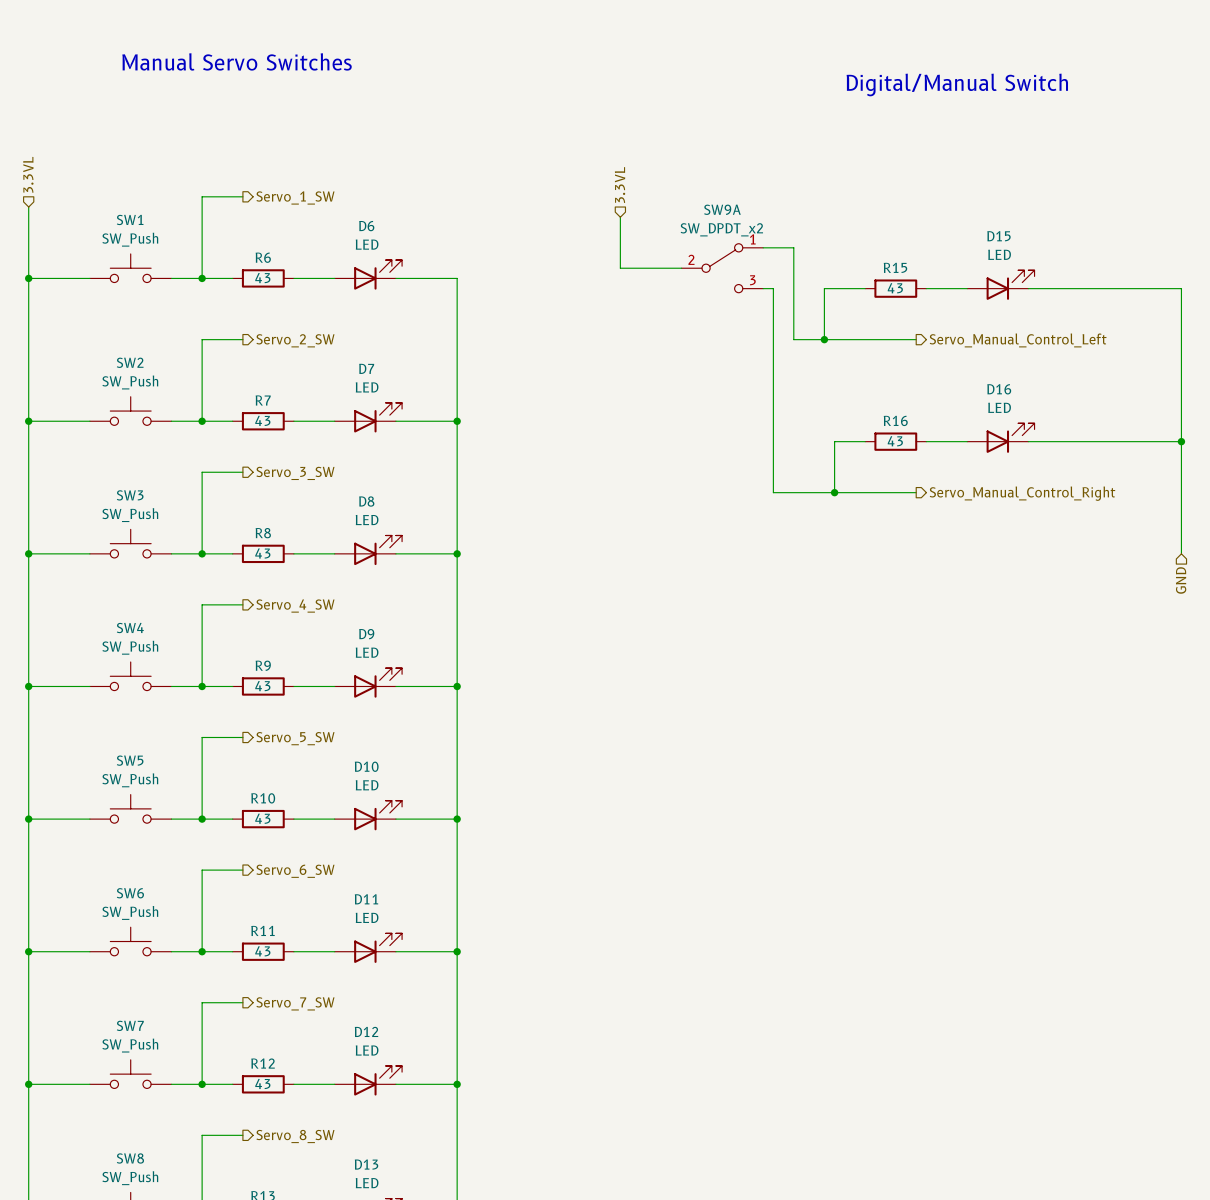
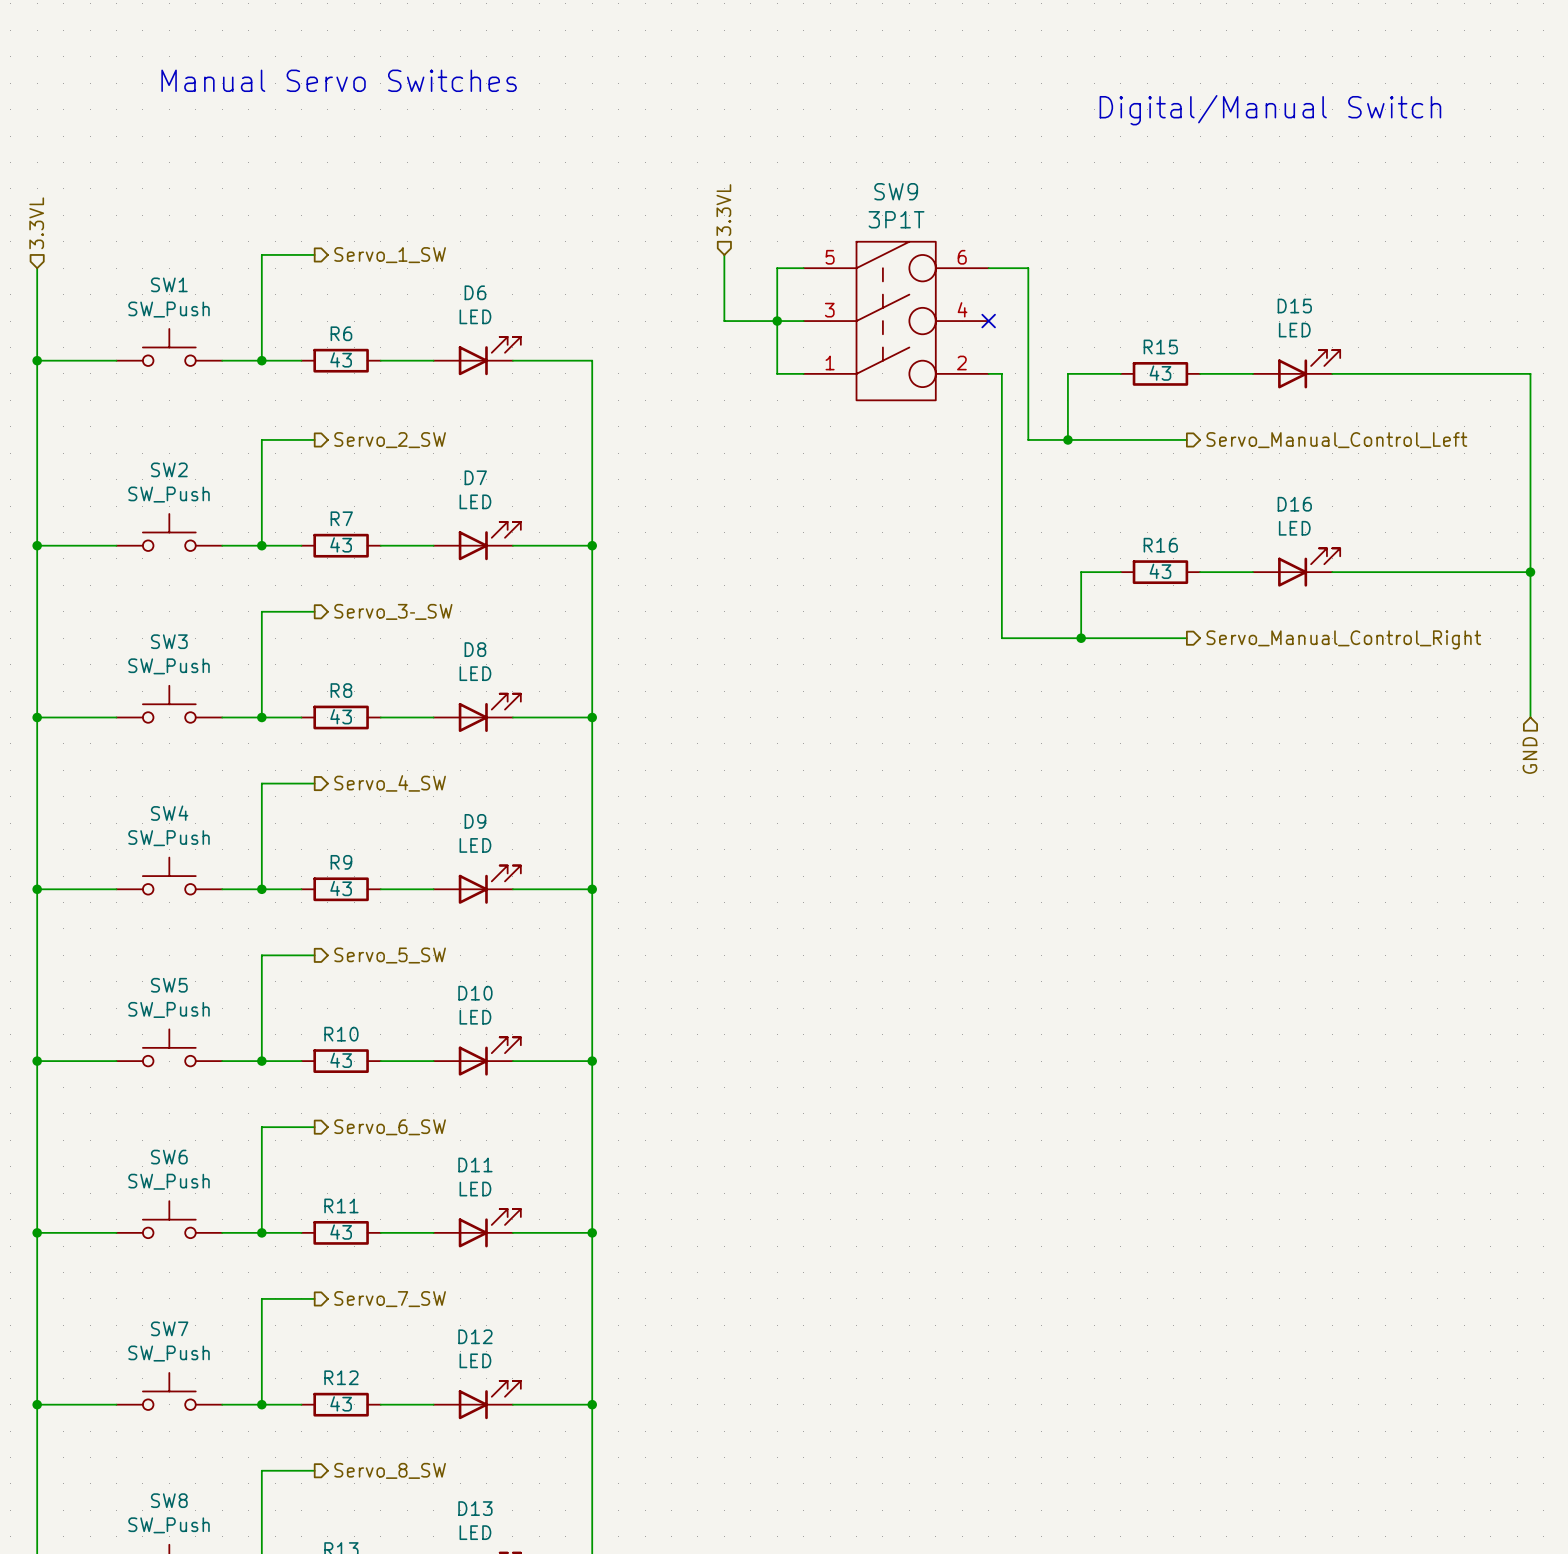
hierarchical label position: 3.3VL (620, 185) -> 3.3VL (723, 210)
wire: none -> (803, 268) (777, 268) (777, 373) (803, 373)
wire: (620, 217) (620, 268) (681, 268) -> (724, 254) (724, 321) (803, 321)
junction: none -> (777, 321)
SW9: none -> 3P1T (896, 321)
wire: (763, 247) (793, 247) -> (988, 268) (1028, 268) (1028, 321)
no-connect mark: none -> (988, 321)
SW9A: SW_DPDT_x2 (722, 268) -> none

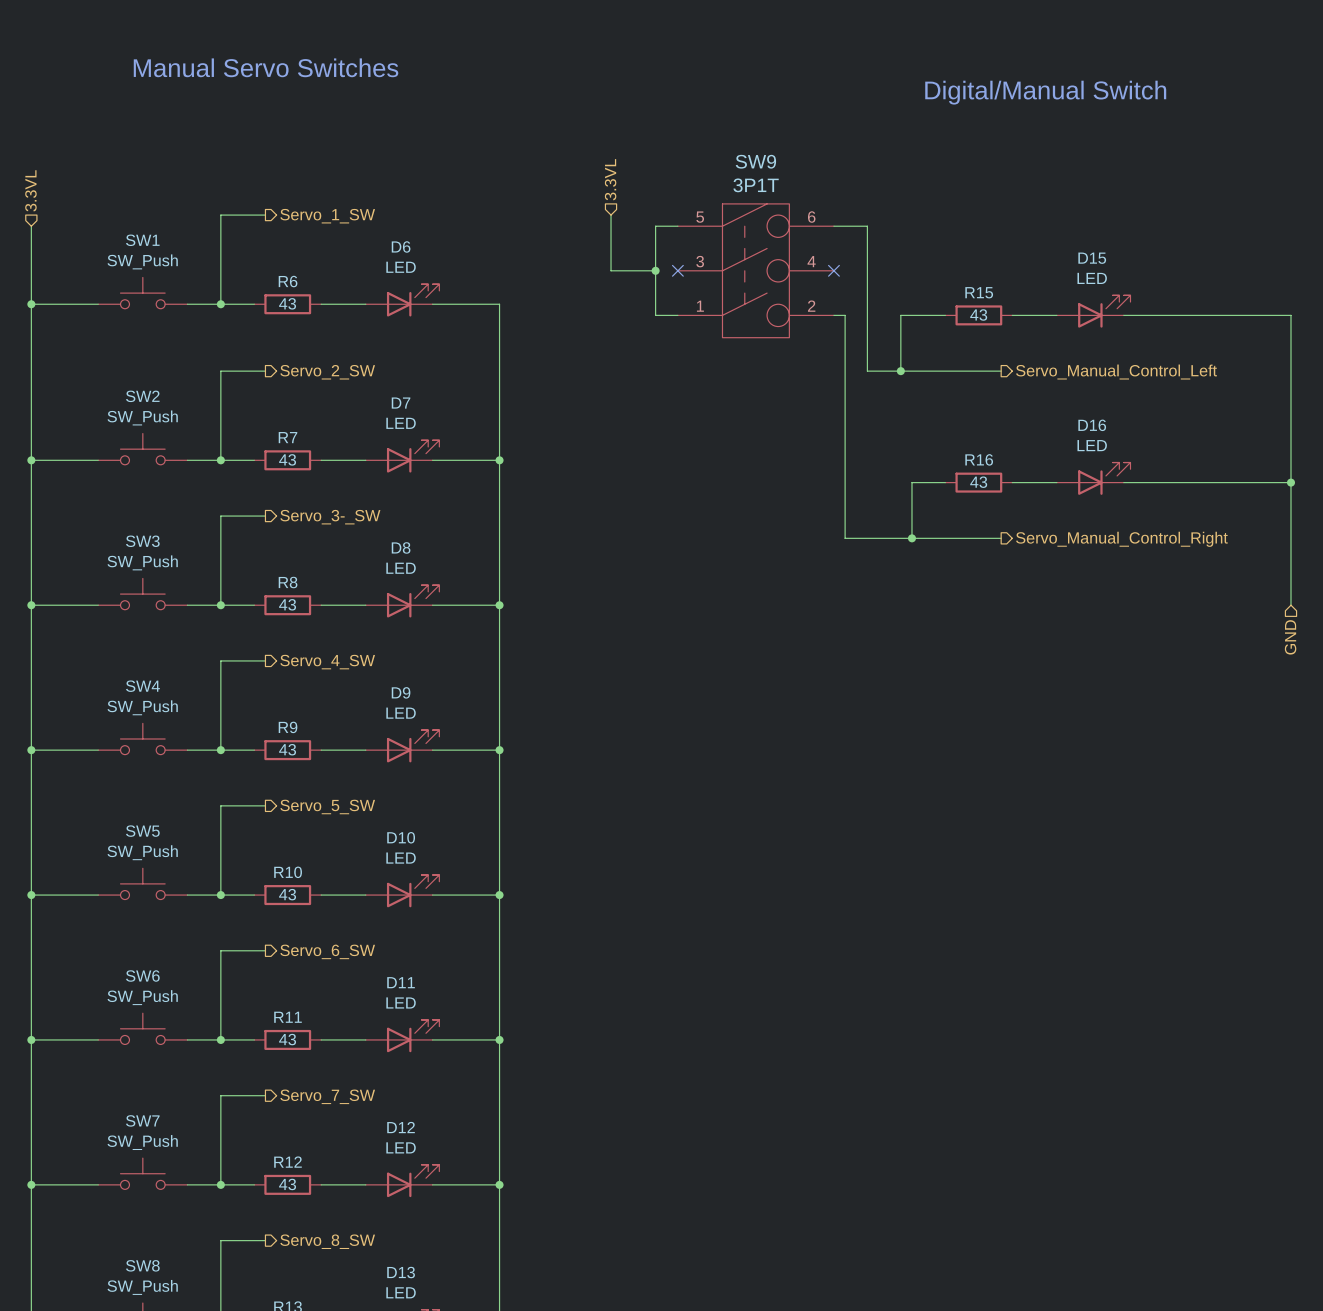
wire: (777, 321) (803, 321) -> none
no-connect mark: none -> (677, 270)

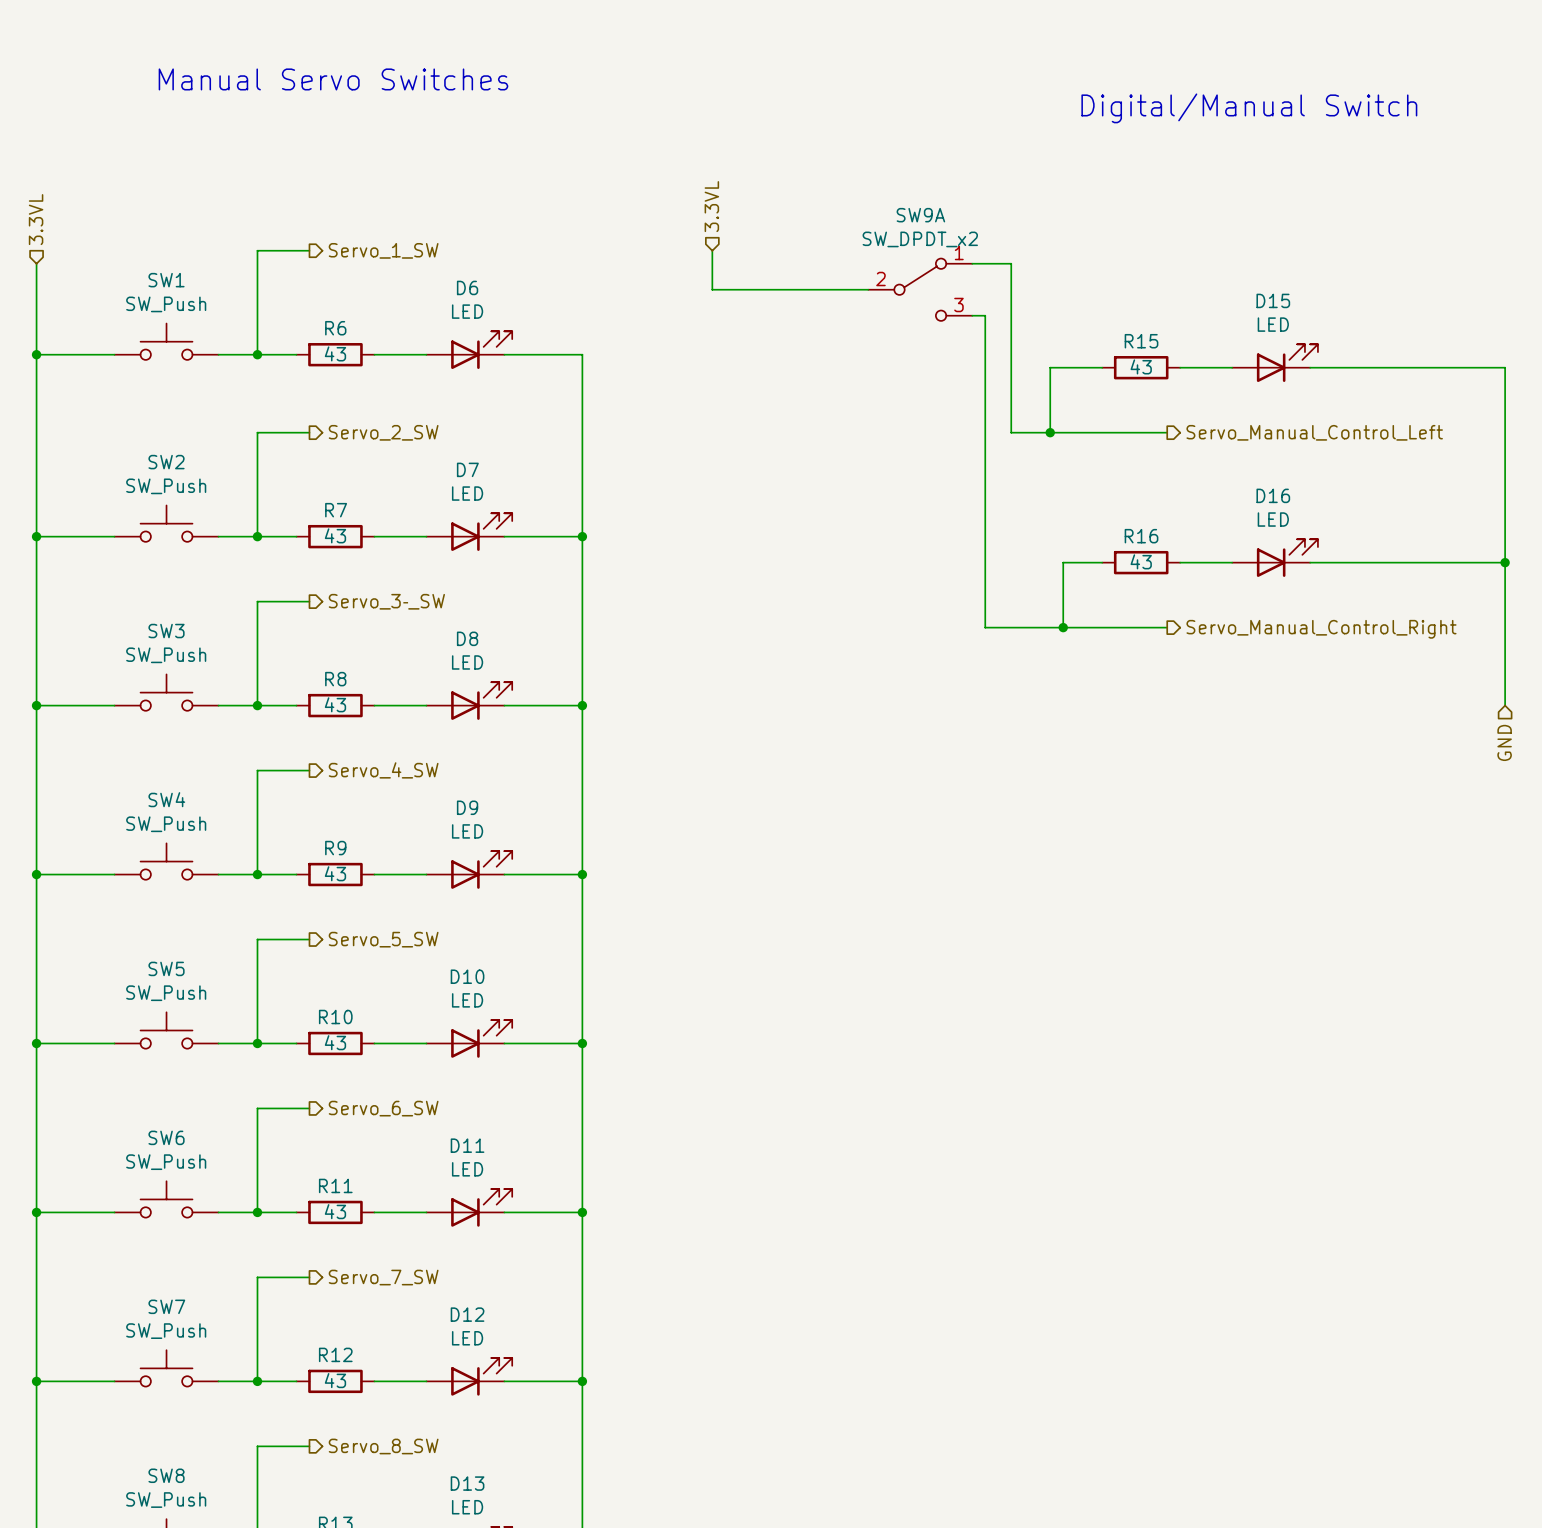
wire: (677, 226) (655, 226) (655, 315) (677, 315) -> none
wire: (611, 248) (611, 270) (655, 270) -> (712, 289) (868, 289)
SW9A: none -> SW_DPDT_x2 (920, 289)
junction: (655, 270) -> none
no-connect mark: (677, 270) -> none
SW9: 3P1T (755, 270) -> none
no-connect mark: (833, 270) -> none
wire: (833, 315) (845, 315) -> (972, 315) (985, 315) (985, 367)

